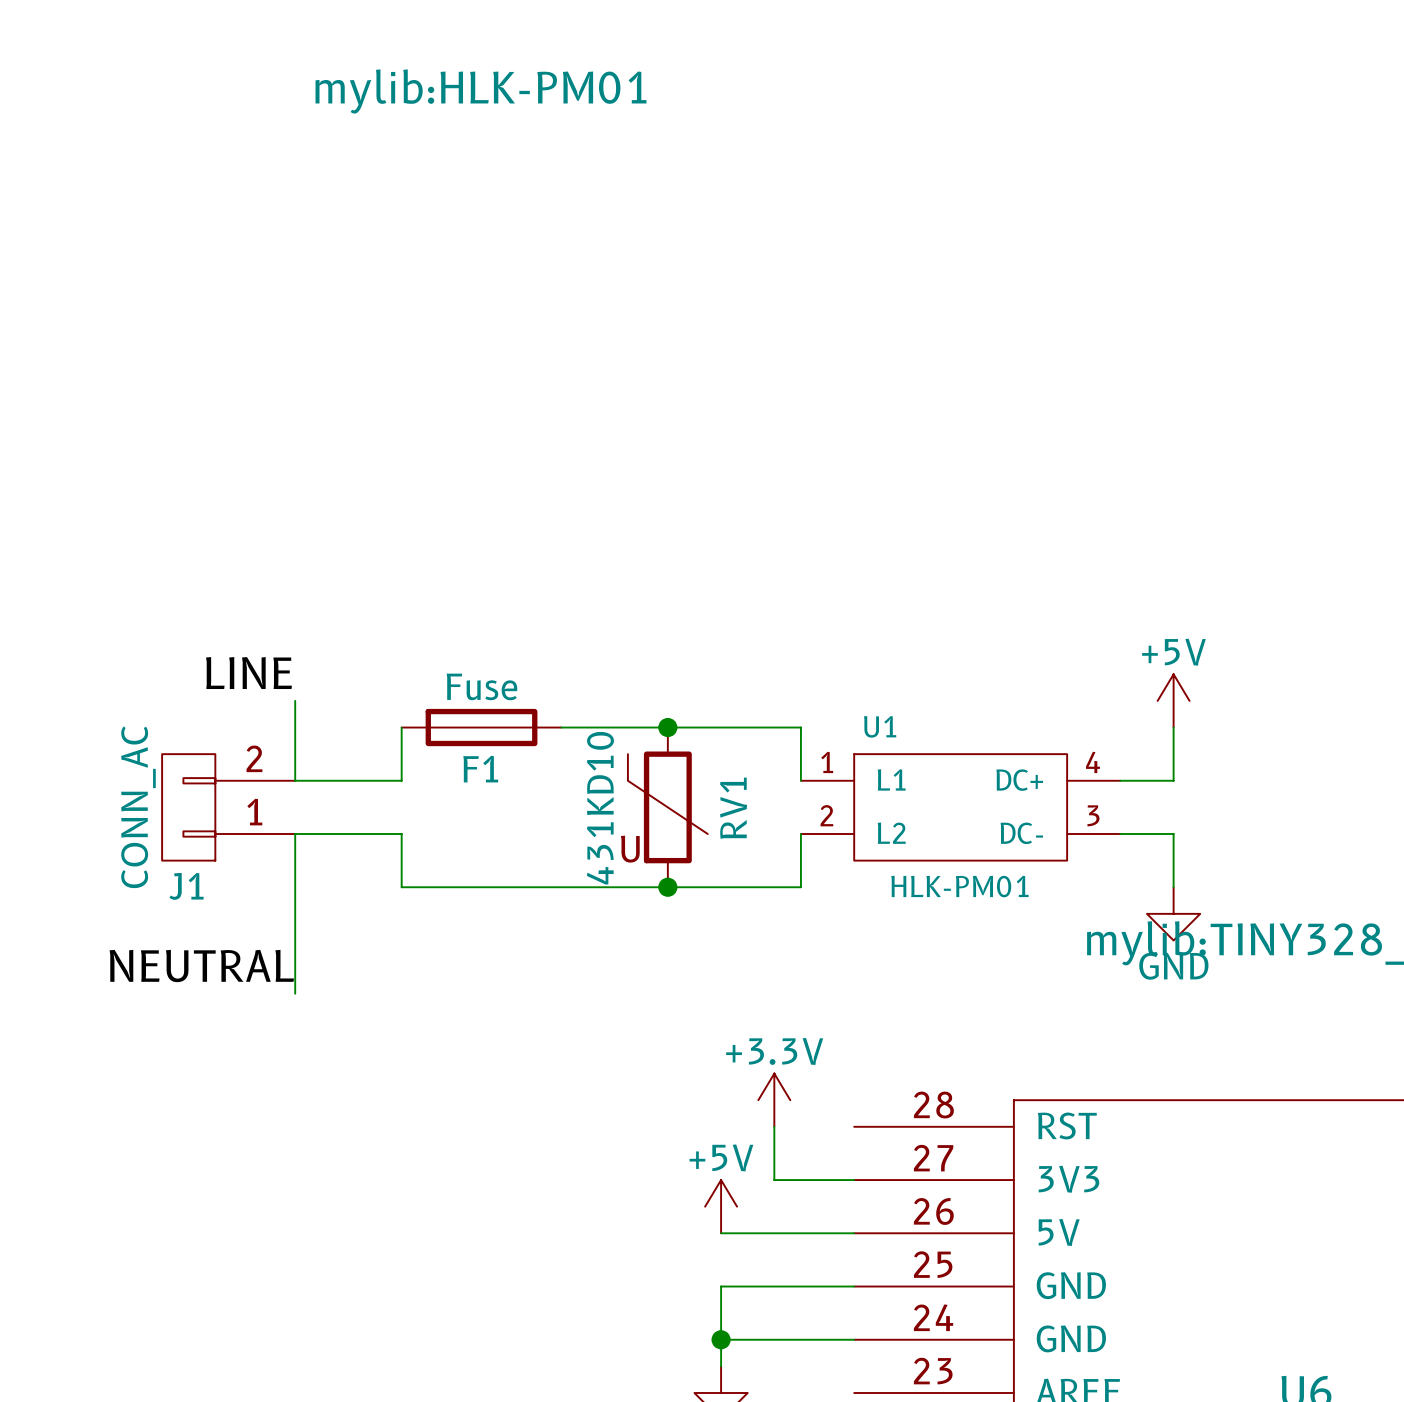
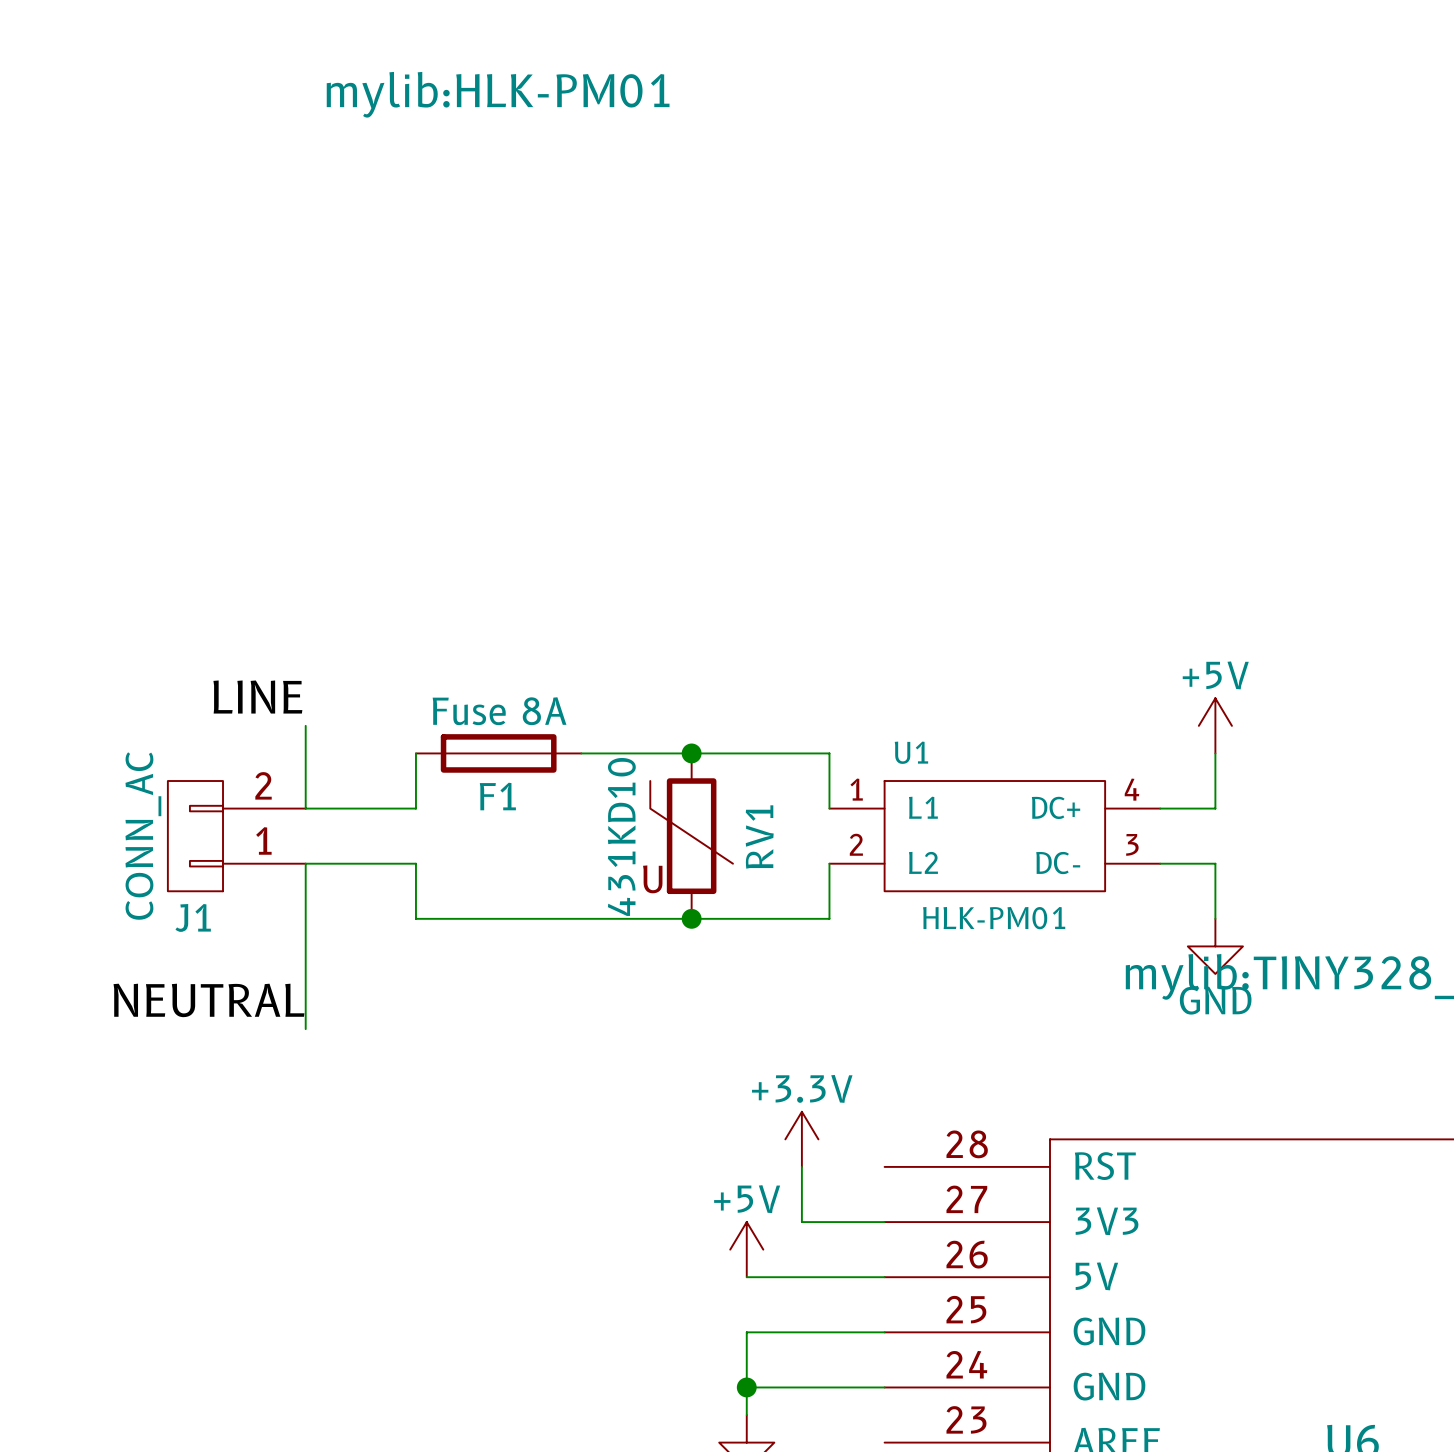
F1 value: Fuse (481, 686) -> Fuse 8A (499, 711)

